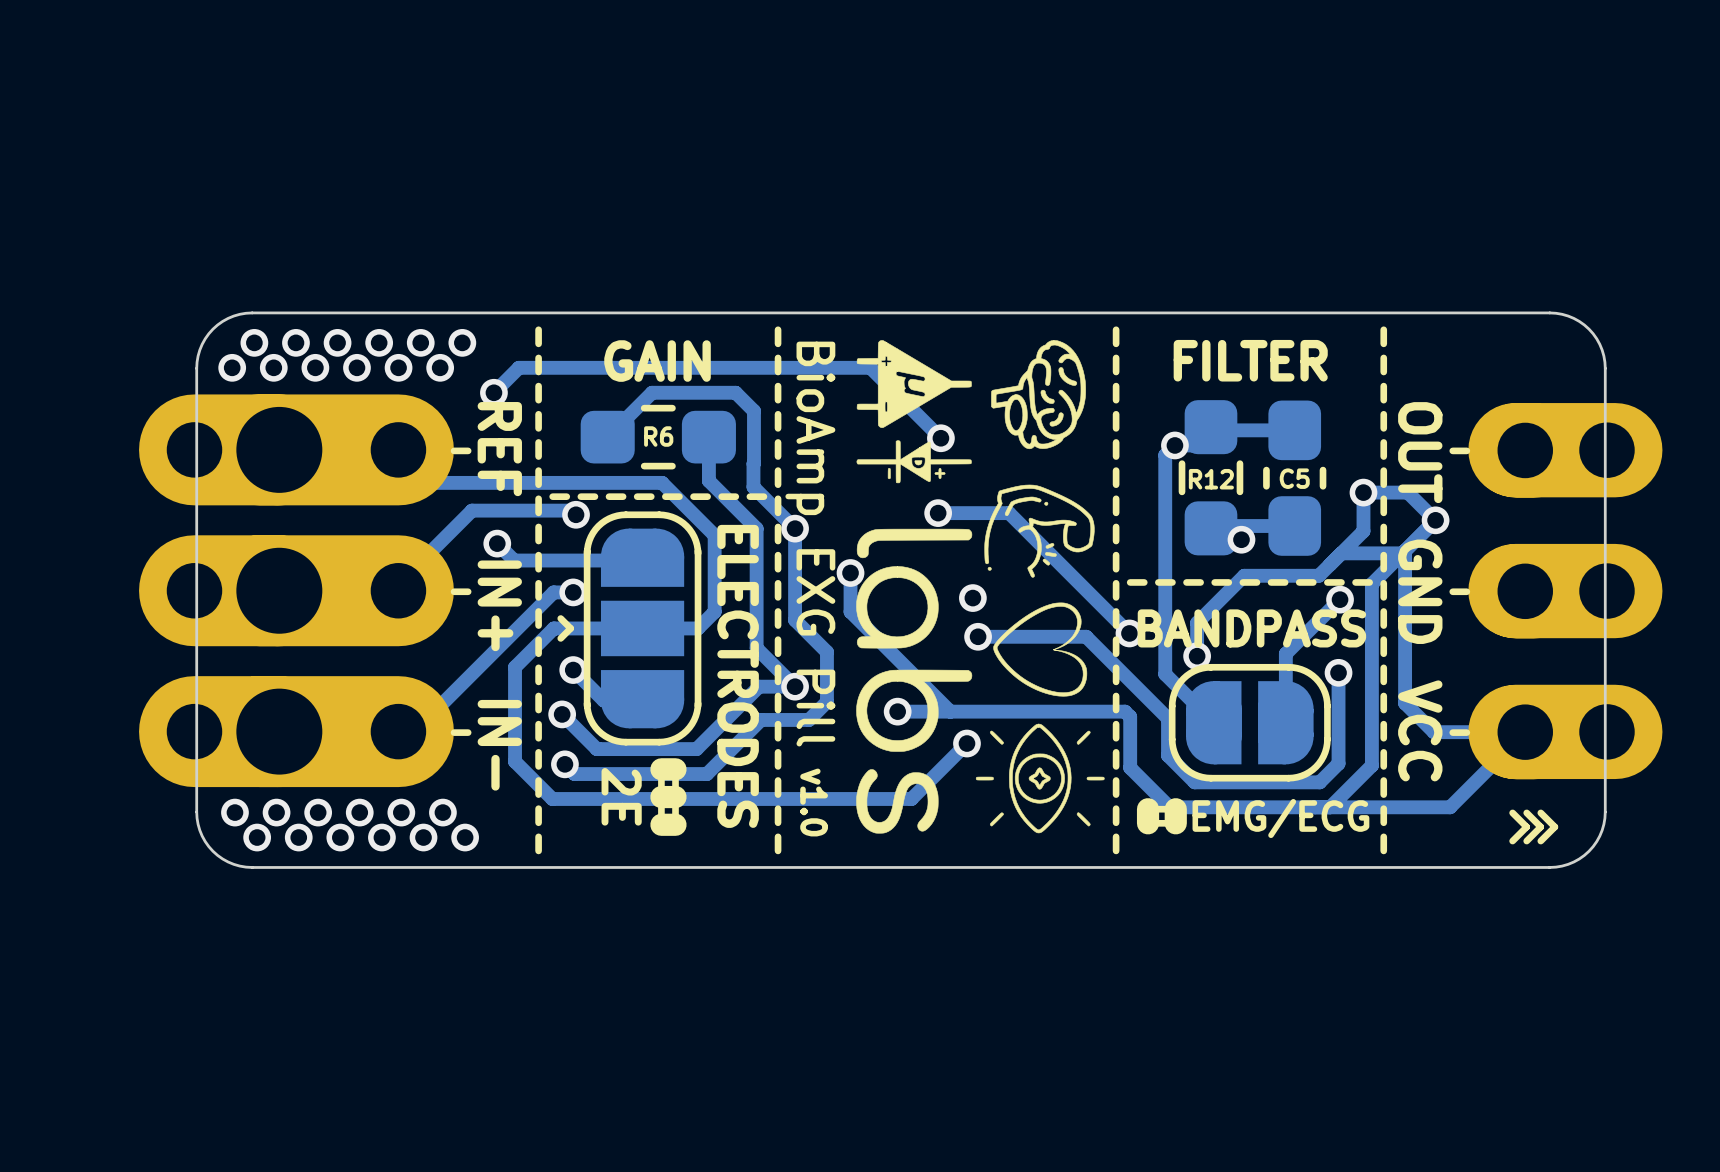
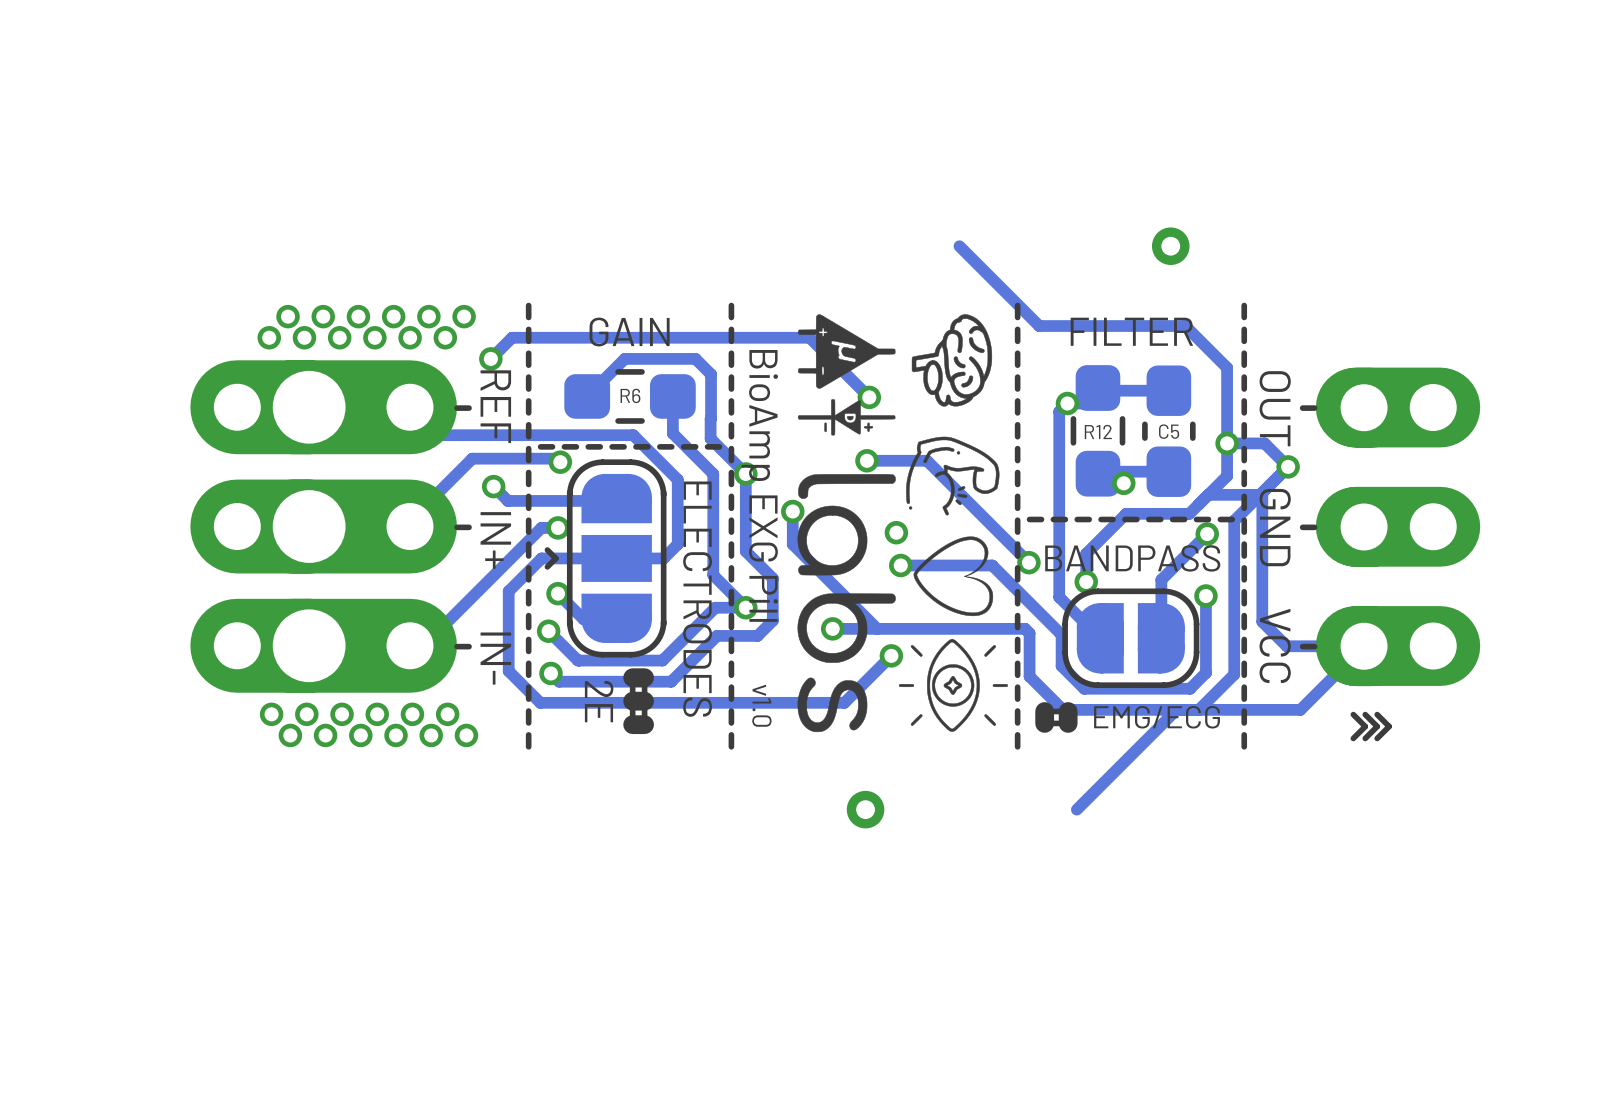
track: none -> (959, 246) (1039, 326) (1185, 326) (1227, 367) (1227, 443)
via: none -> (1170, 246)
board edge: (1549, 312) (252, 312) (233, 316) (217, 325) (208, 333) (199, 350) (197, 362) (196, 812) (199, 830) (205, 841) (217, 855) (233, 864) (252, 867) (1549, 867) (1568, 864) (1579, 858) (1593, 846) (1599, 836) (1604, 818) (1605, 368) (1602, 350) (1589, 329) (1573, 318) (1549, 312) -> none
track: none -> (1176, 709) (1076, 809)
via: none -> (865, 809)

